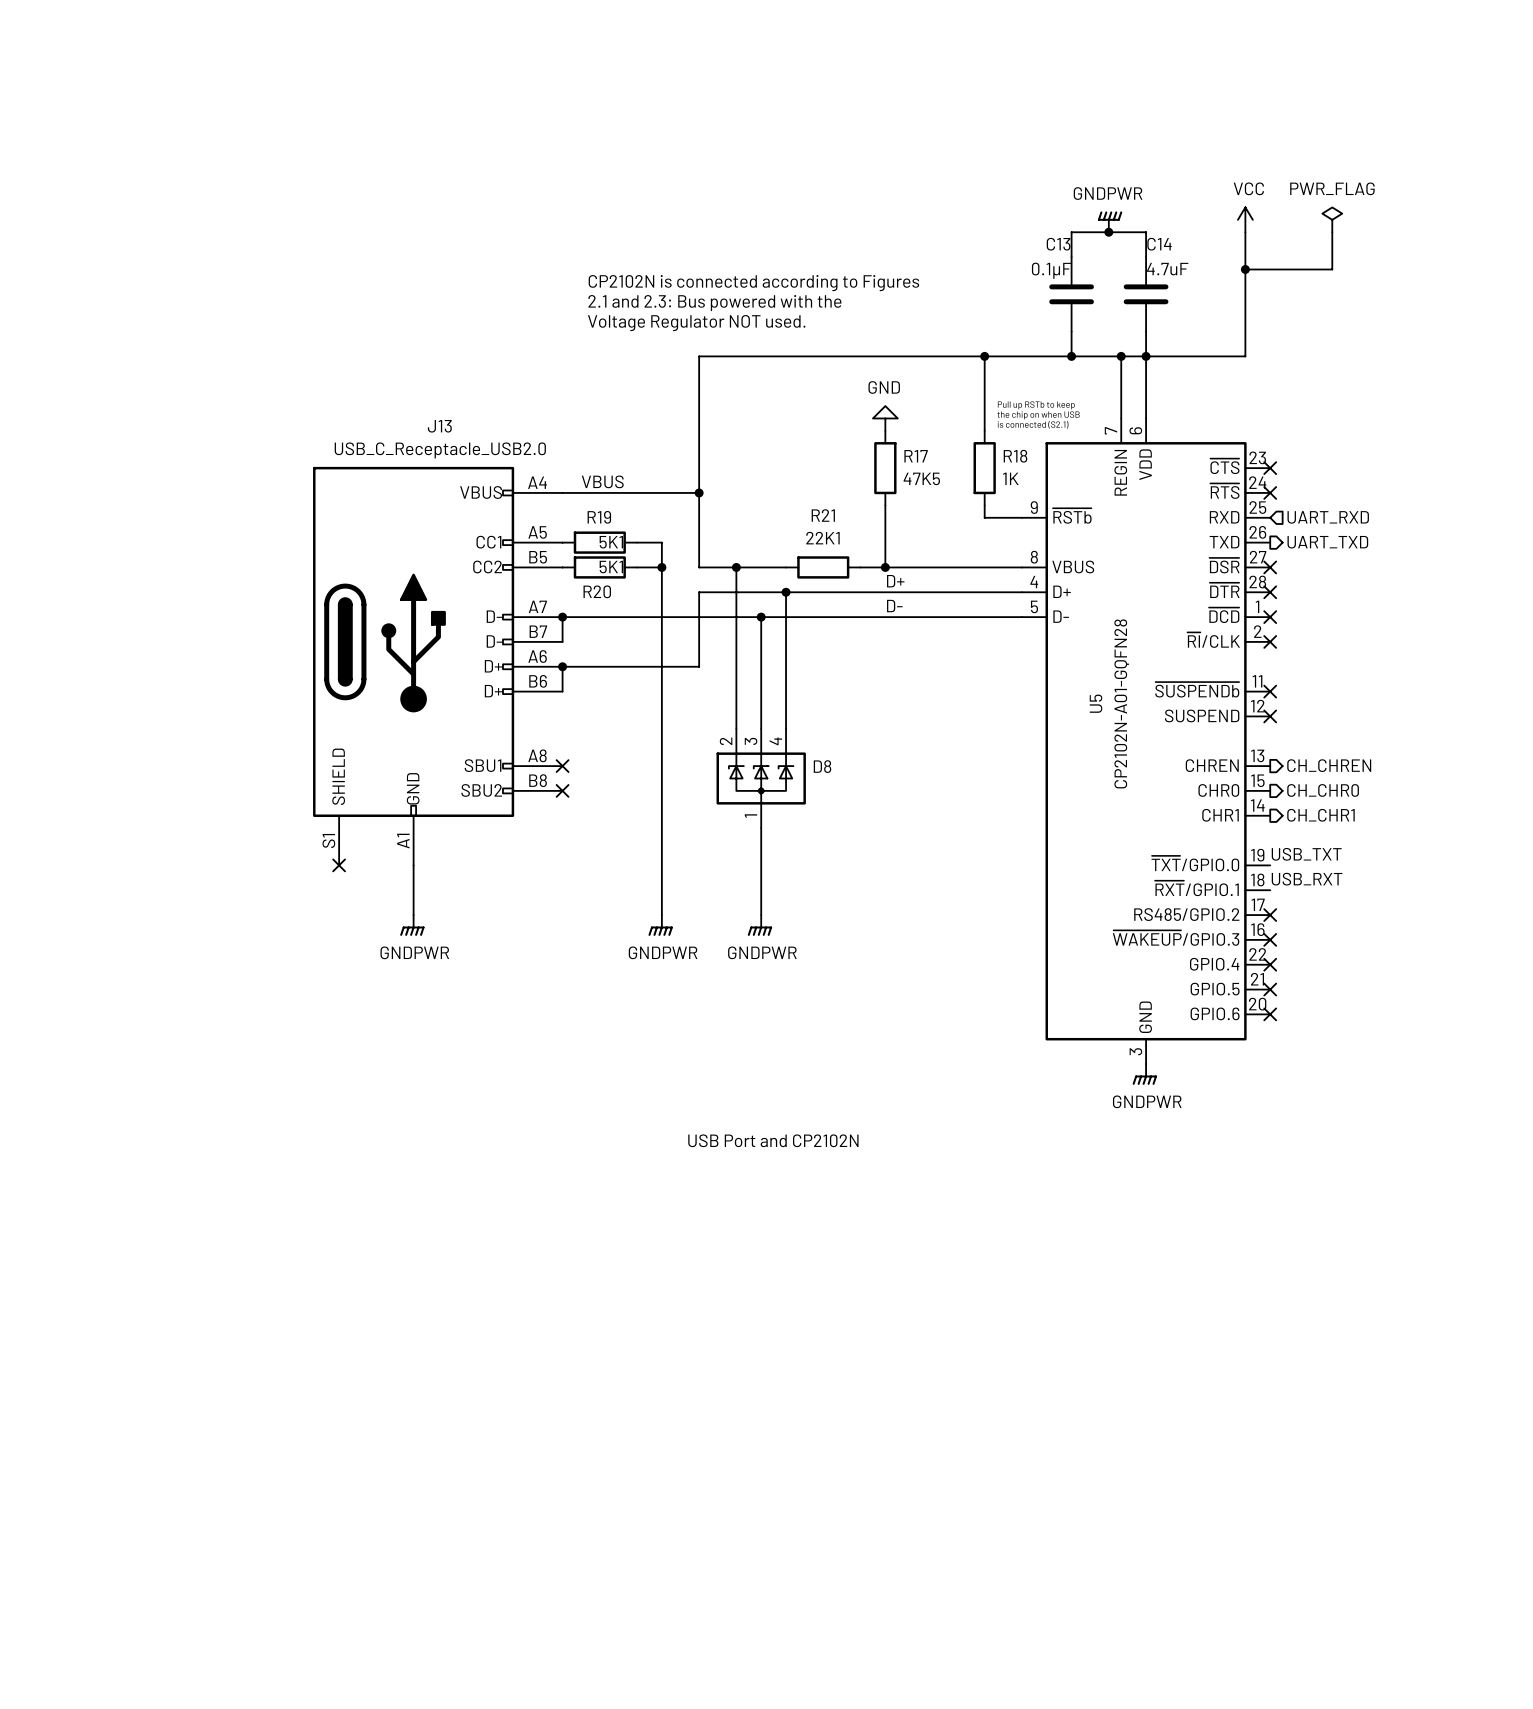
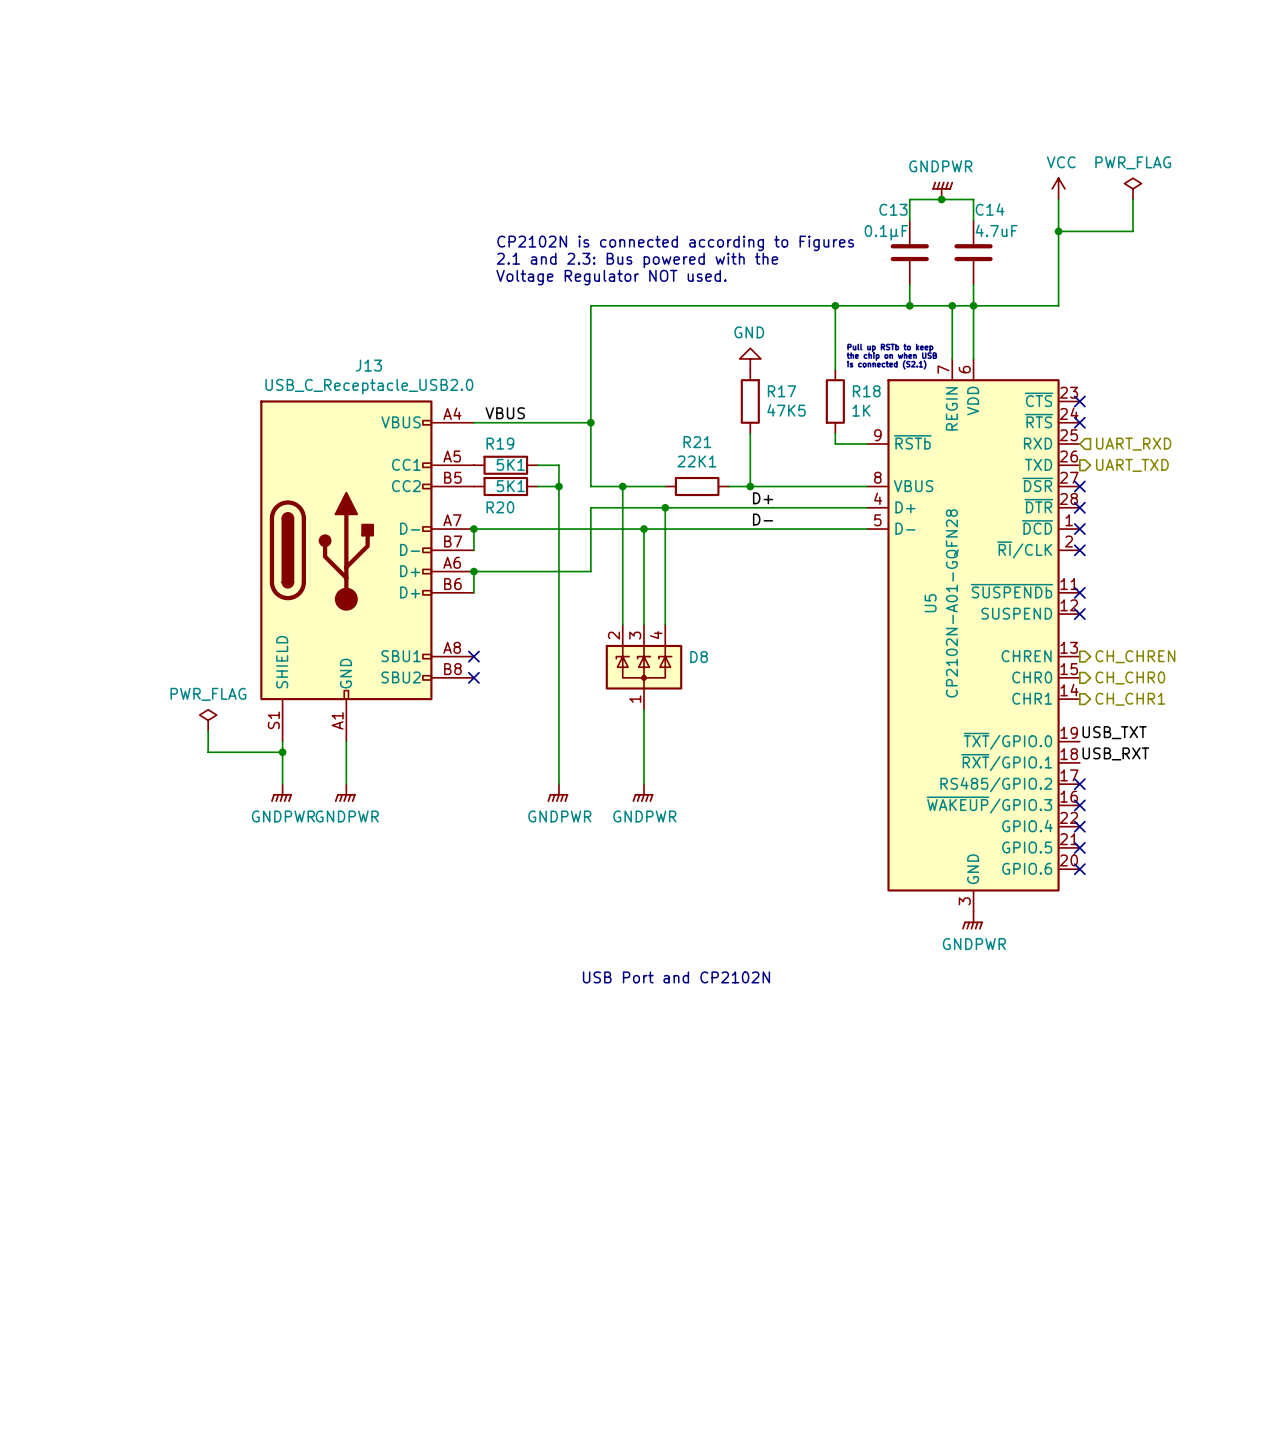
power symbol: none -> PWR_FLAG (208, 720)
wire: none -> (208, 731) (208, 752) (282, 752)
wire: none -> (282, 741) (282, 784)
no-connect mark: (339, 865) -> none
junction: none -> (282, 752)
power symbol: none -> GNDPWR (281, 793)

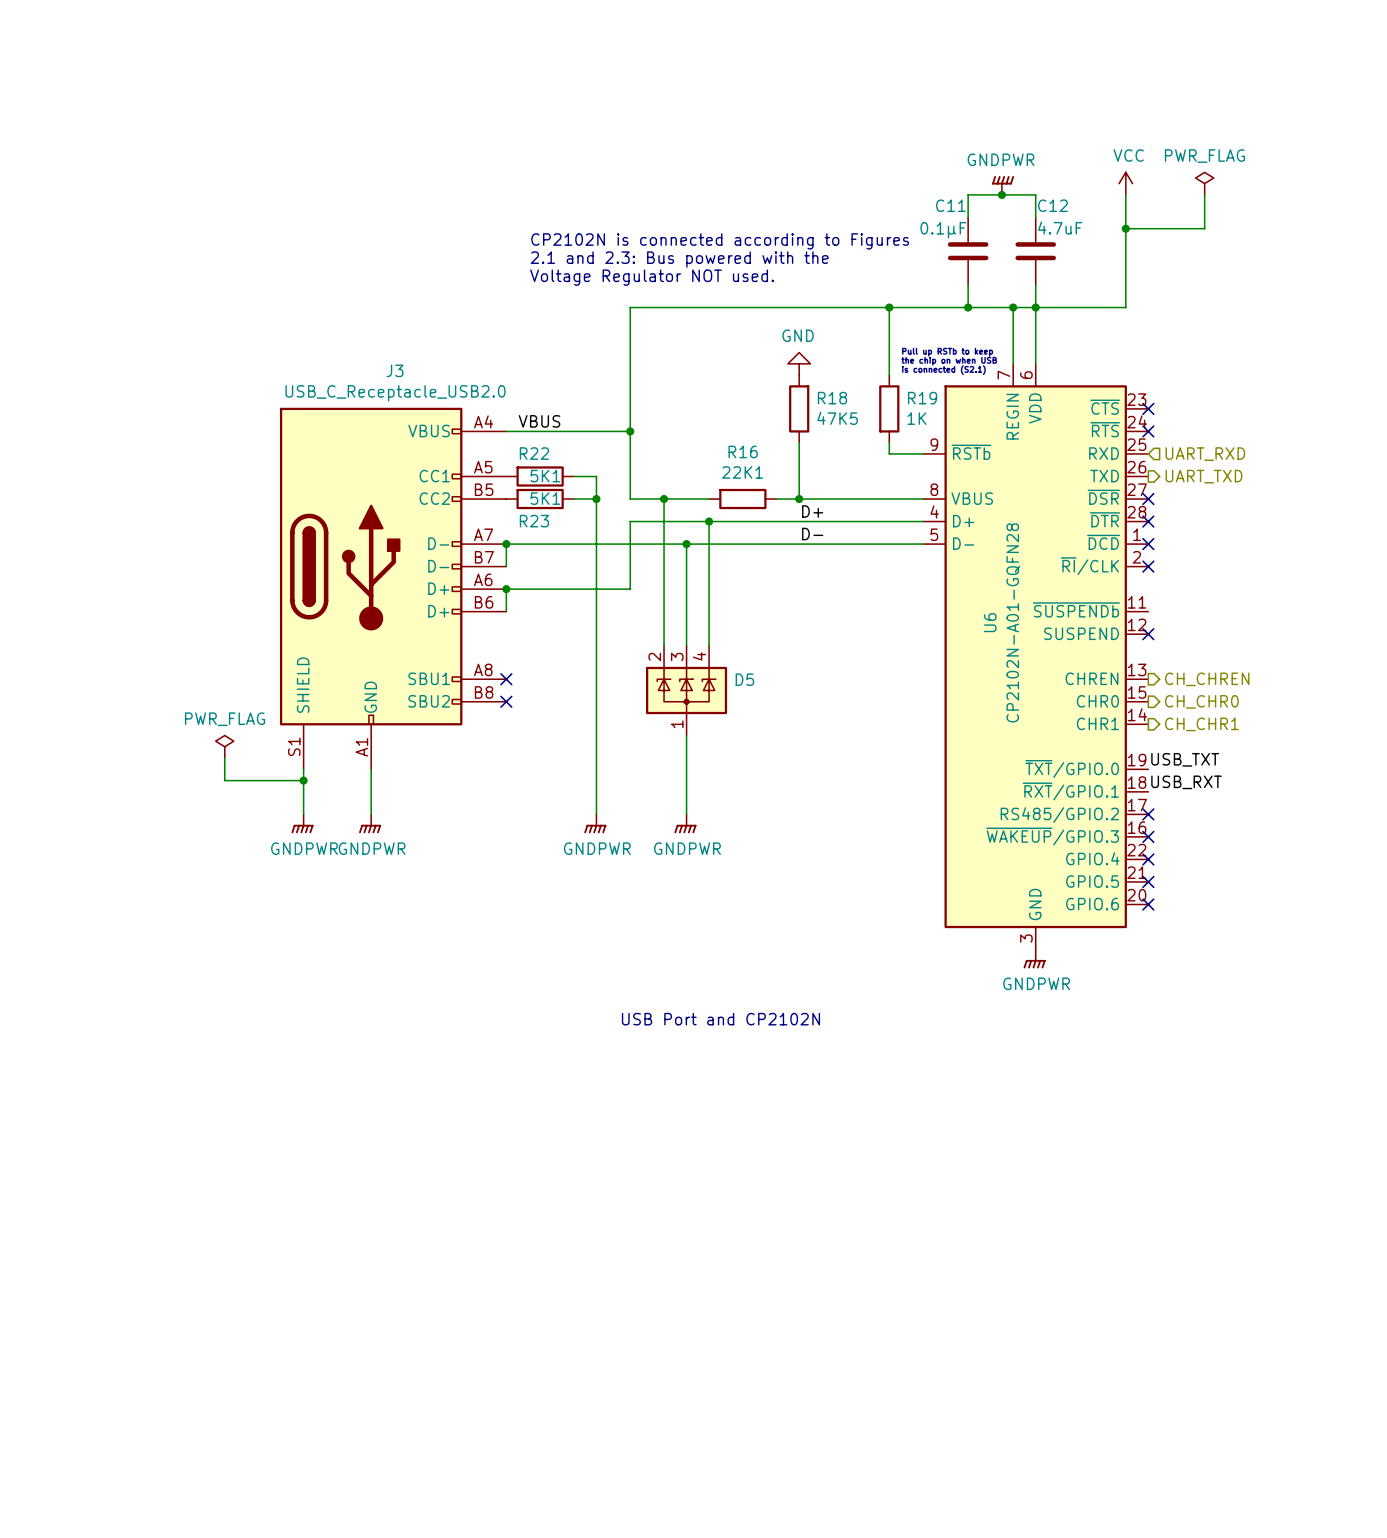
C13 name: C13 (893, 209) -> C11 (950, 205)
C14 name: C14 (990, 209) -> C12 (1052, 205)
J13 name: J13 (368, 365) -> J3 (395, 370)
R17 name: R17 (781, 391) -> R18 (832, 398)
R18 name: R18 (866, 391) -> R19 (922, 398)
R21 name: R21 (697, 442) -> R16 (743, 451)
R19 name: R19 (500, 443) -> R22 (534, 453)
R20 name: R20 (500, 507) -> R23 (534, 521)
no-connect mark: (1079, 592) -> none
U5 name: U5 (930, 603) -> U6 (990, 622)
D8 name: D8 (699, 657) -> D5 (744, 679)

